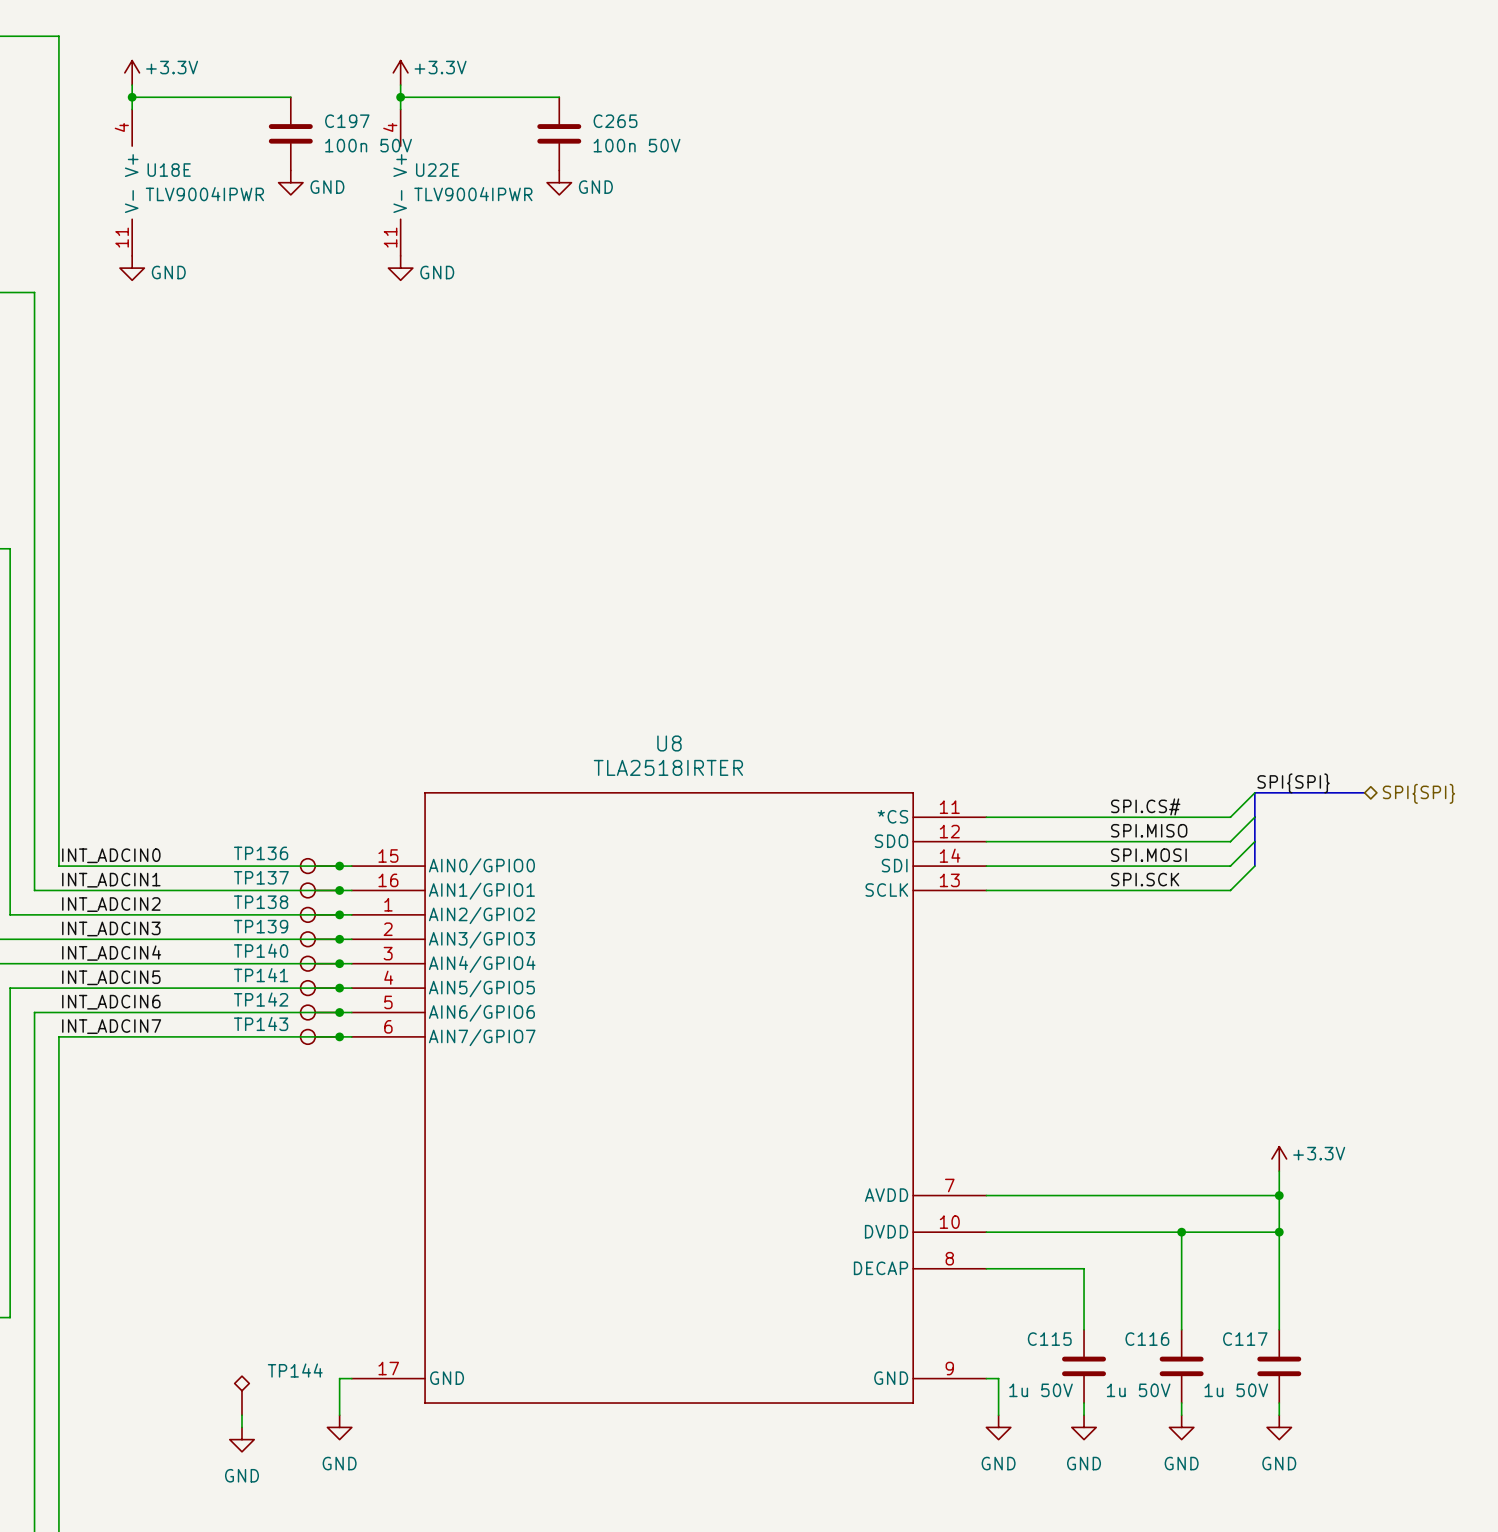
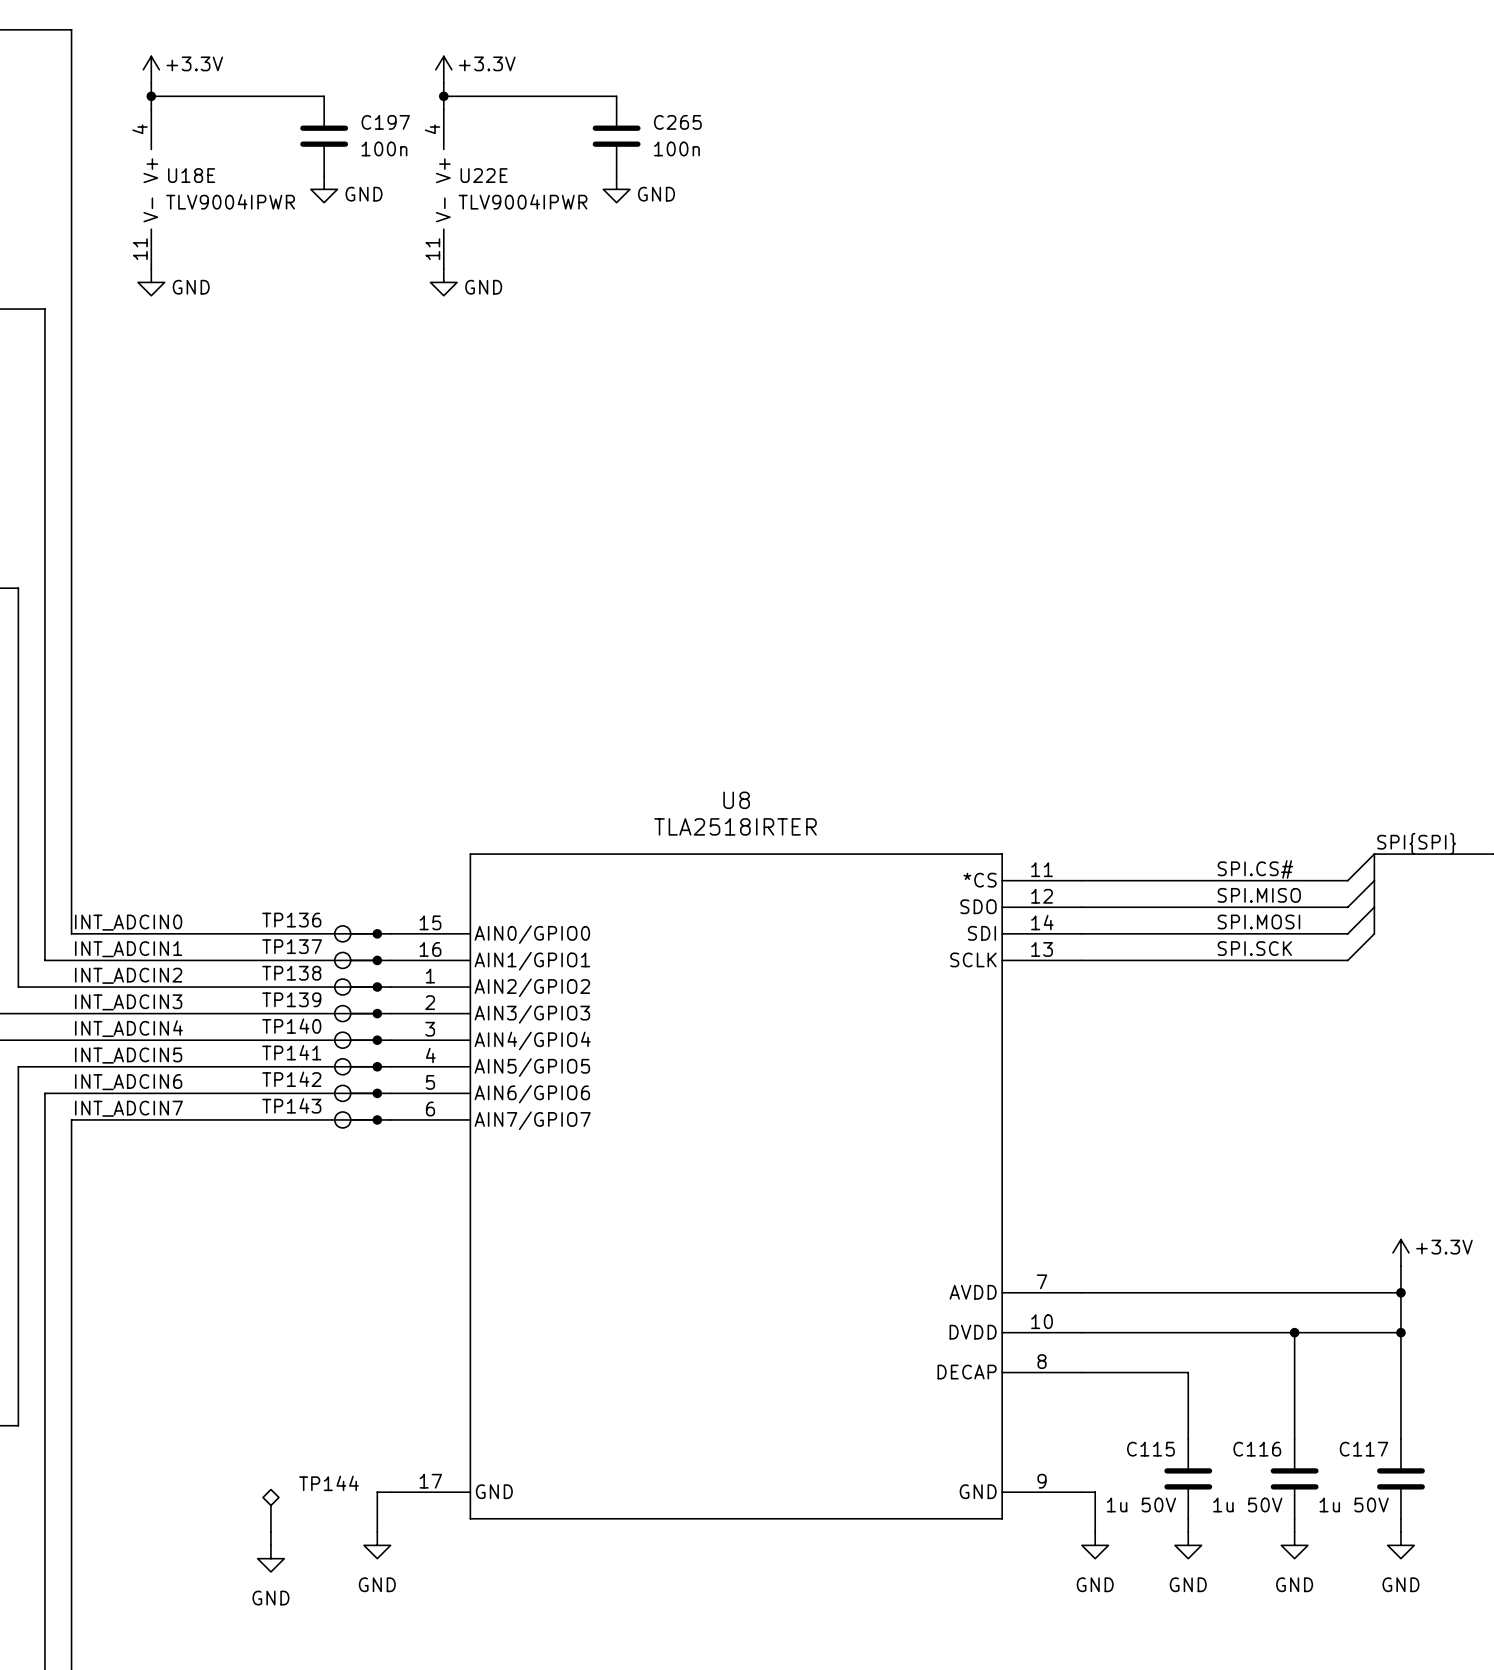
C197 value: 100n 50V (368, 145) -> 100n (384, 148)
C265 value: 100n 50V (637, 145) -> 100n (676, 148)

